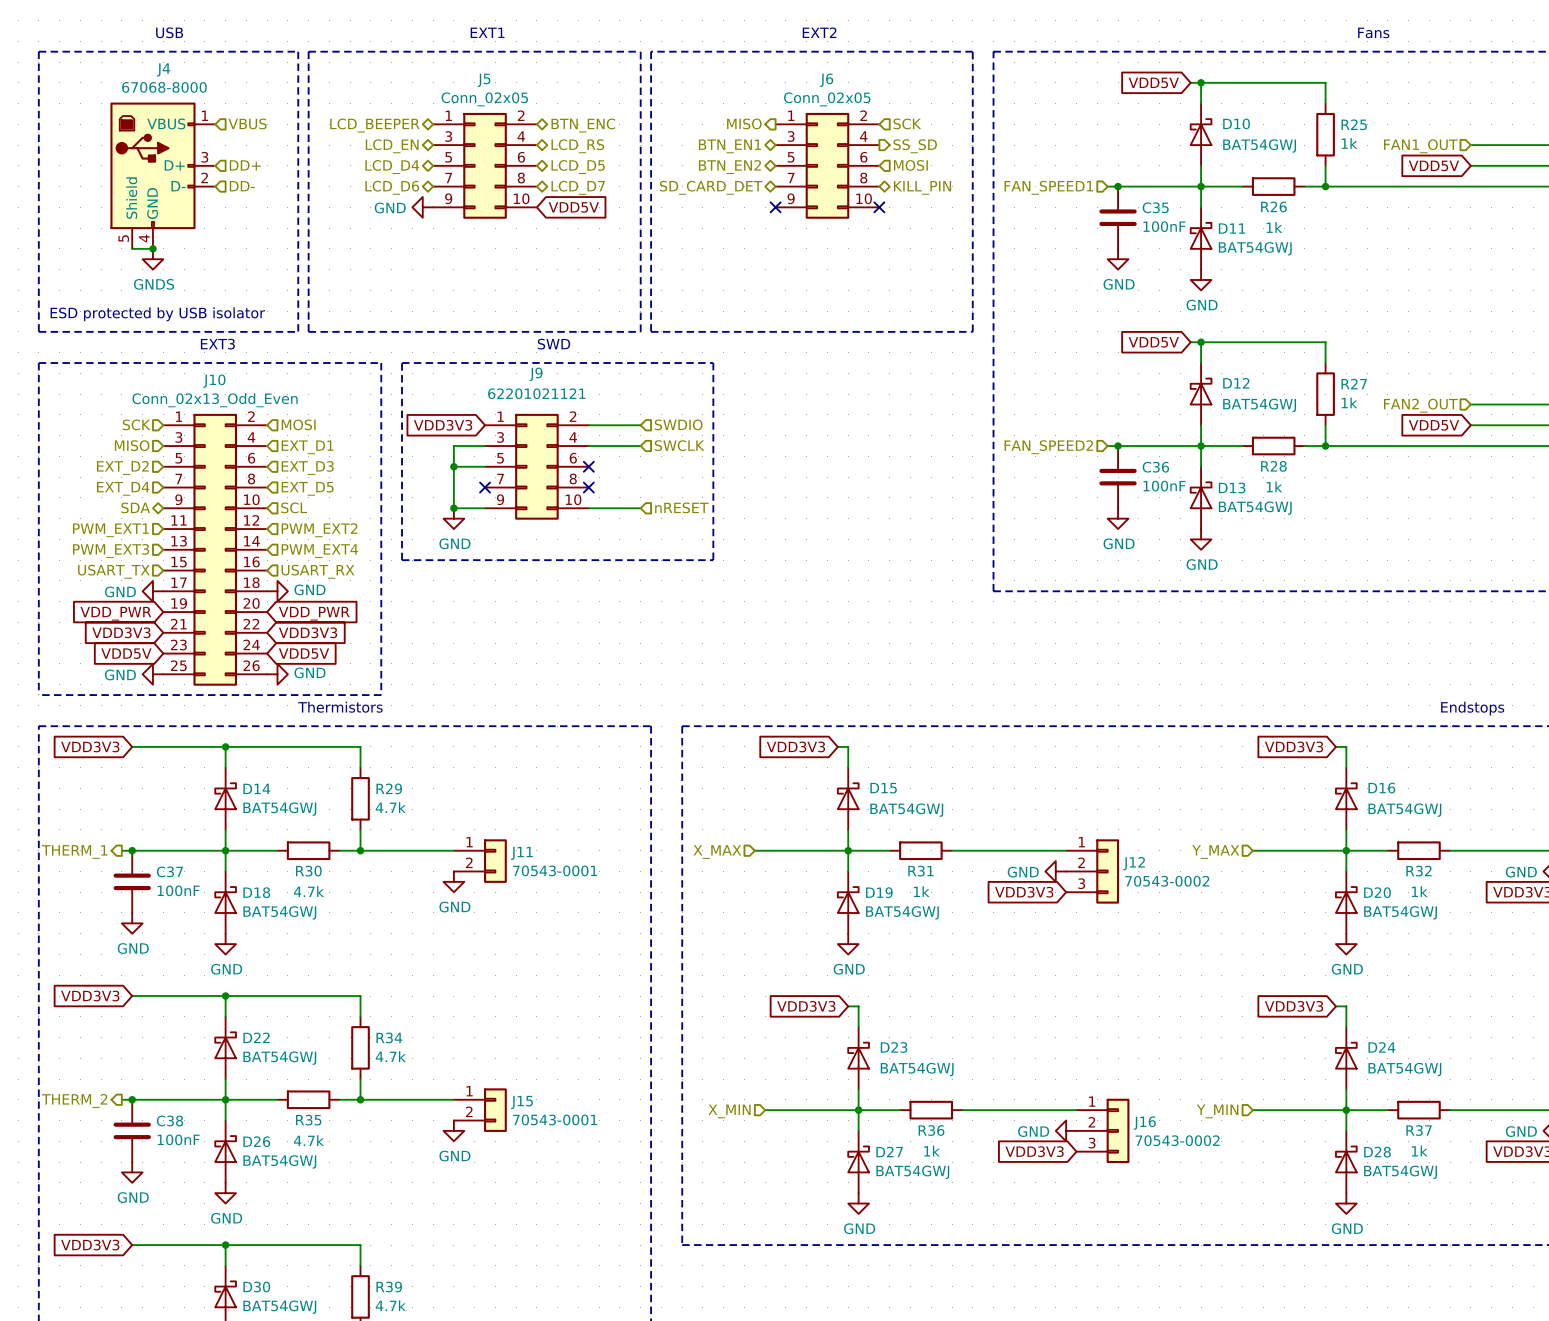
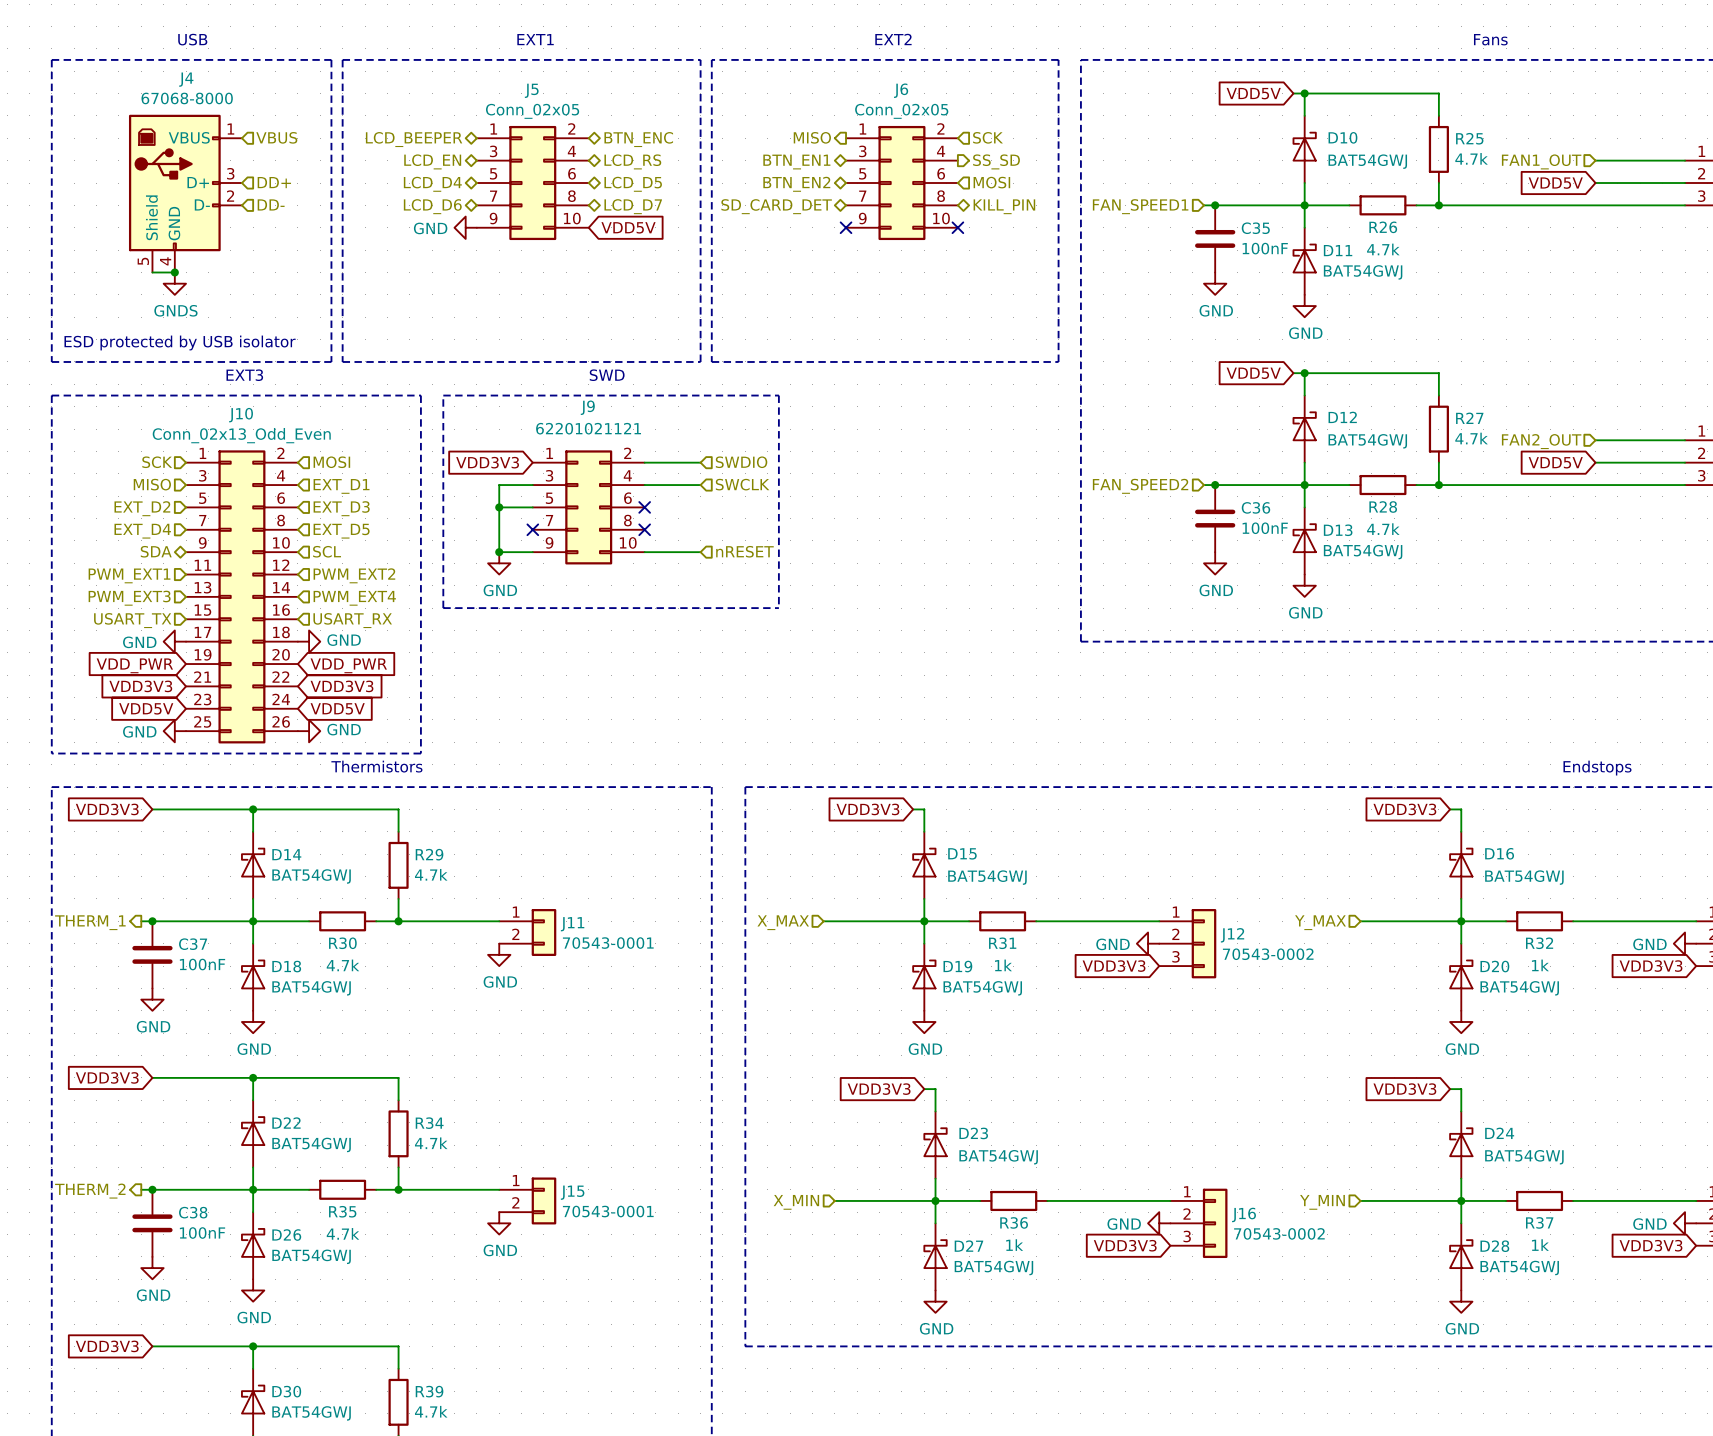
R25 value: 1k (1349, 143) -> 4.7k (1471, 158)
R26 value: 1k (1274, 227) -> 4.7k (1383, 249)
R27 value: 1k (1349, 402) -> 4.7k (1471, 438)
R28 value: 1k (1274, 486) -> 4.7k (1383, 529)

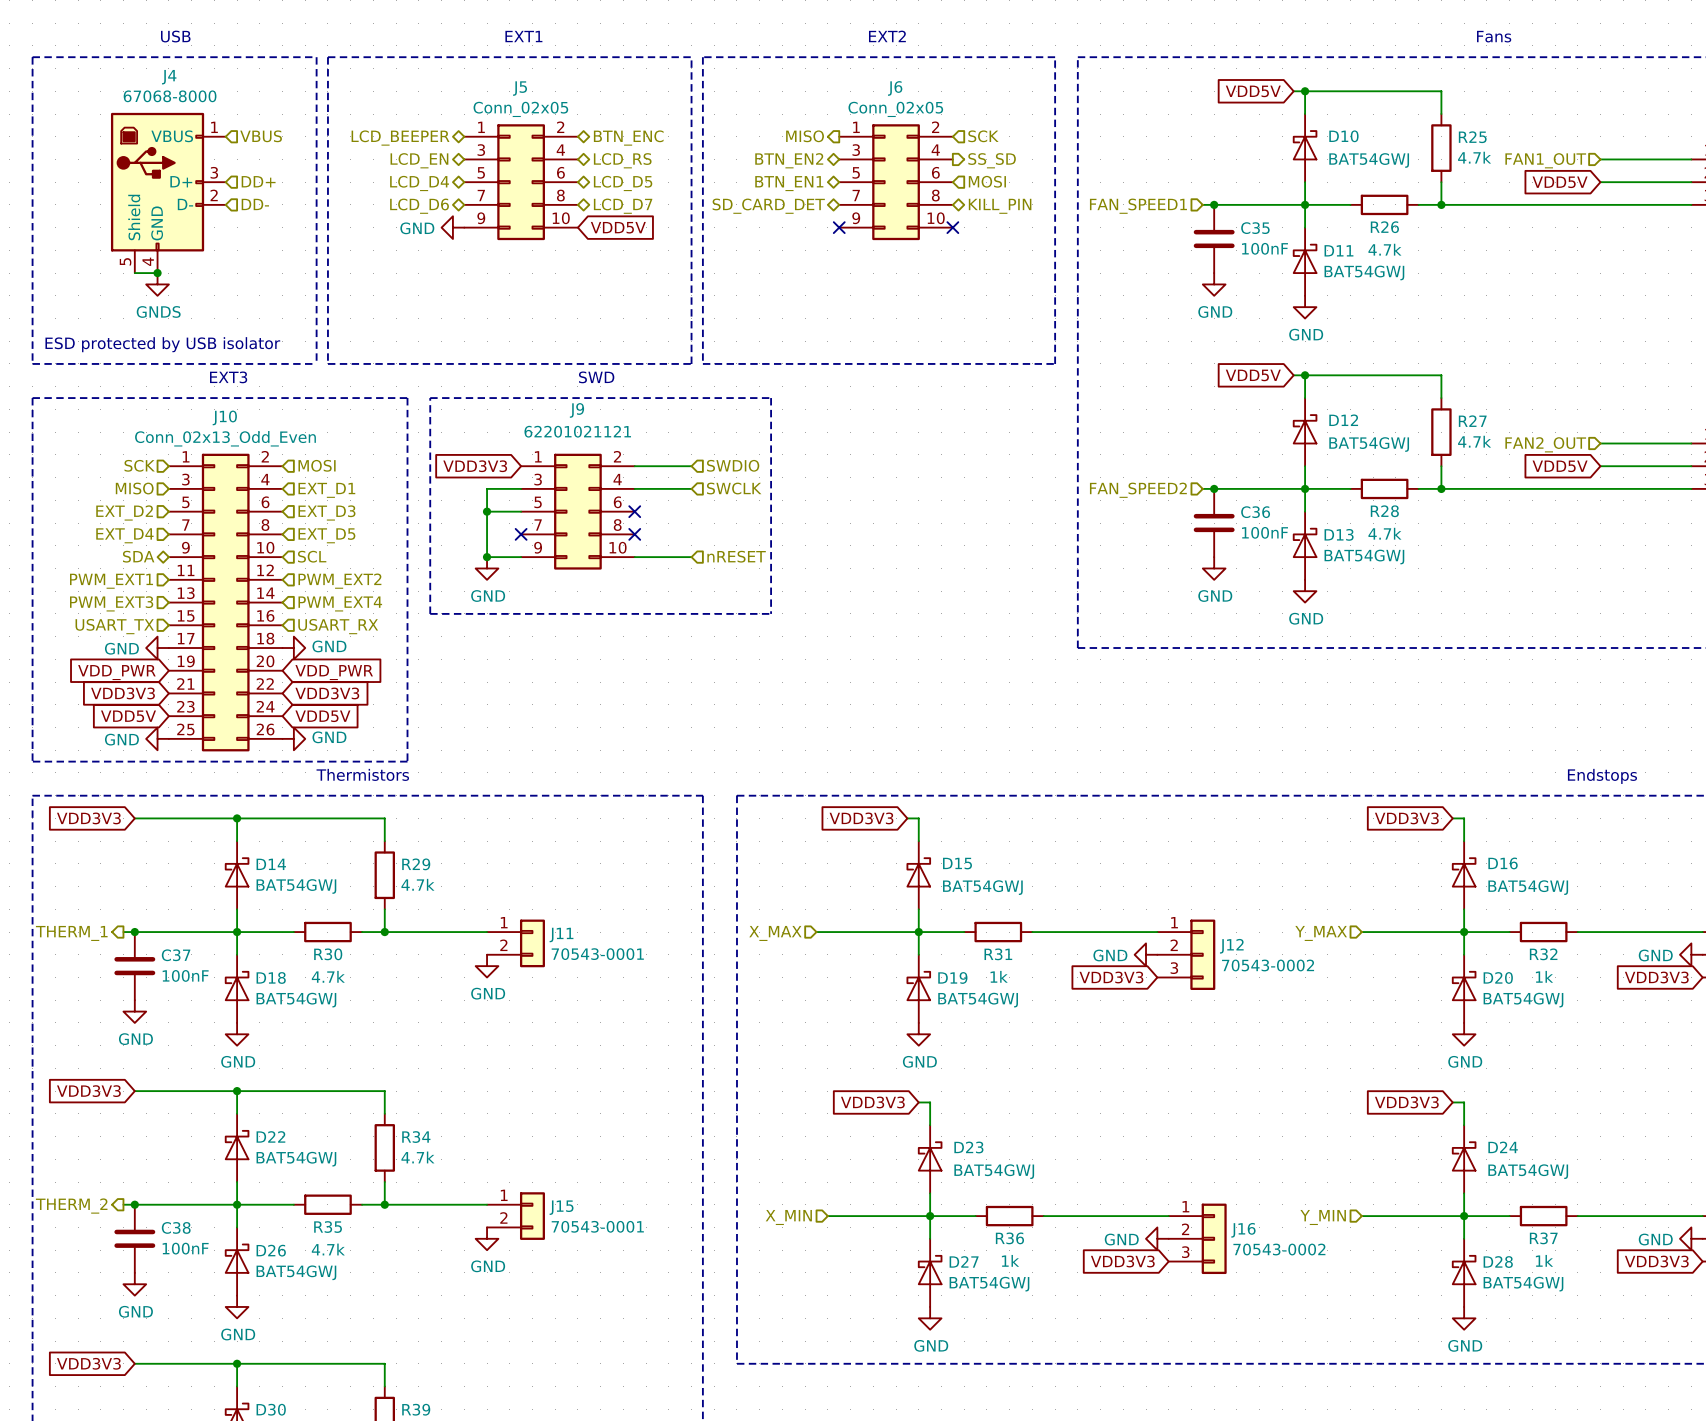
hierarchical label: BTN_EN1 (796, 162) -> BTN_EN2 (789, 160)
hierarchical label: BTN_EN2 (796, 184) -> BTN_EN1 (789, 183)

